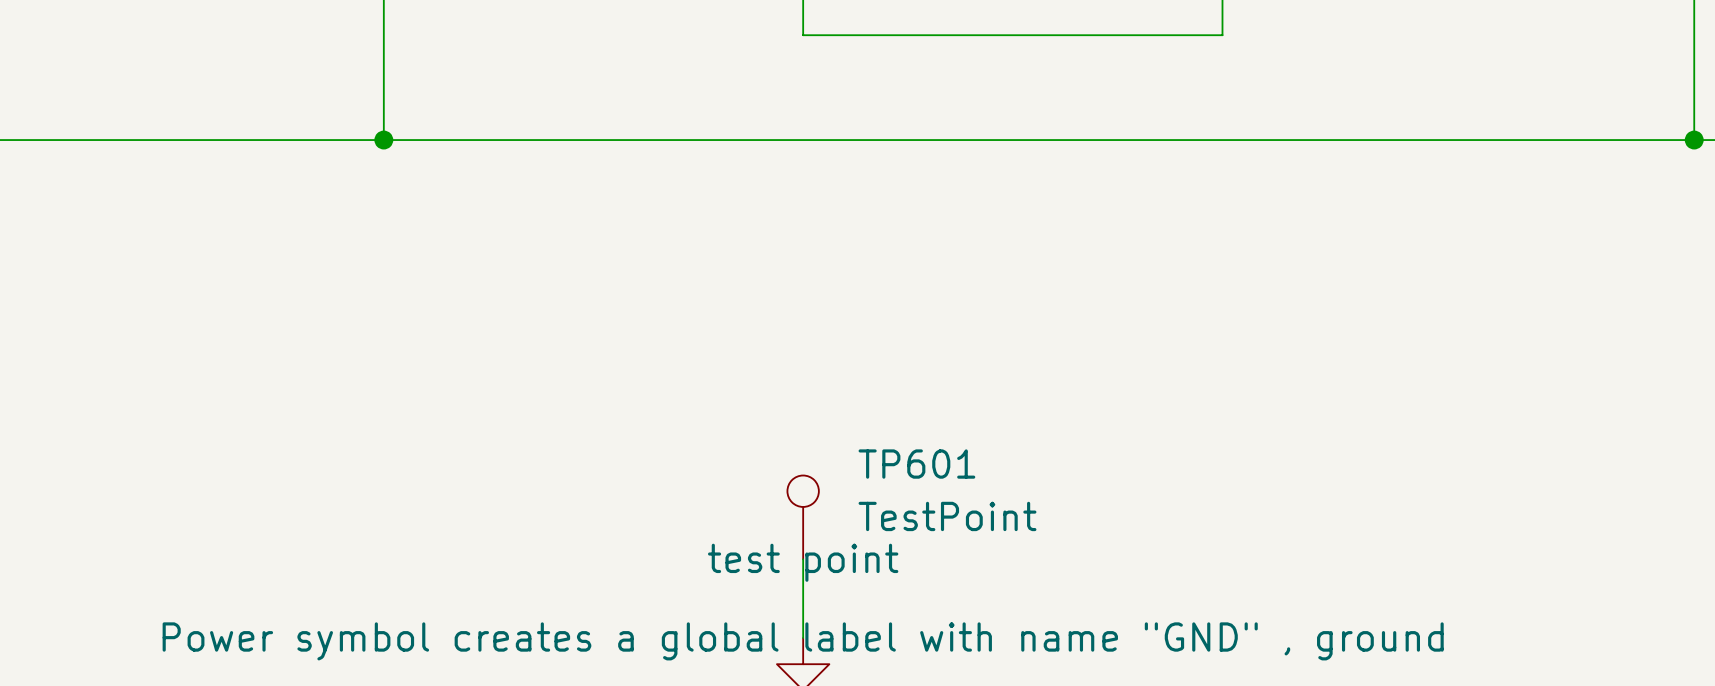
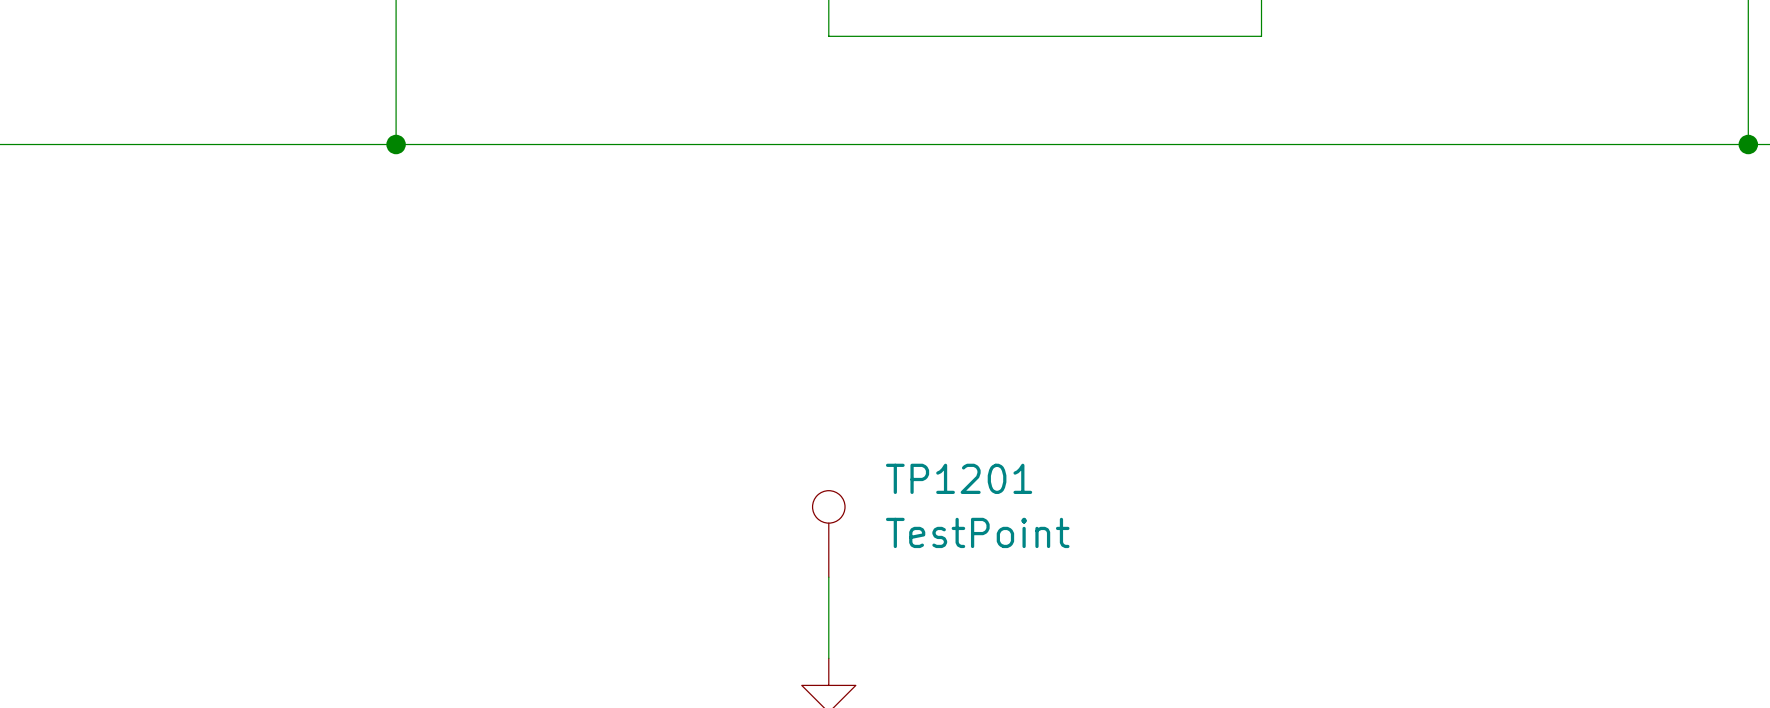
TP601 name: TP601 (916, 464) -> TP1201 (959, 478)
TP601 text: test point (803, 562) -> none
power symbol text: Power symbol creates a global label with name "GND" , ground (803, 641) -> none

